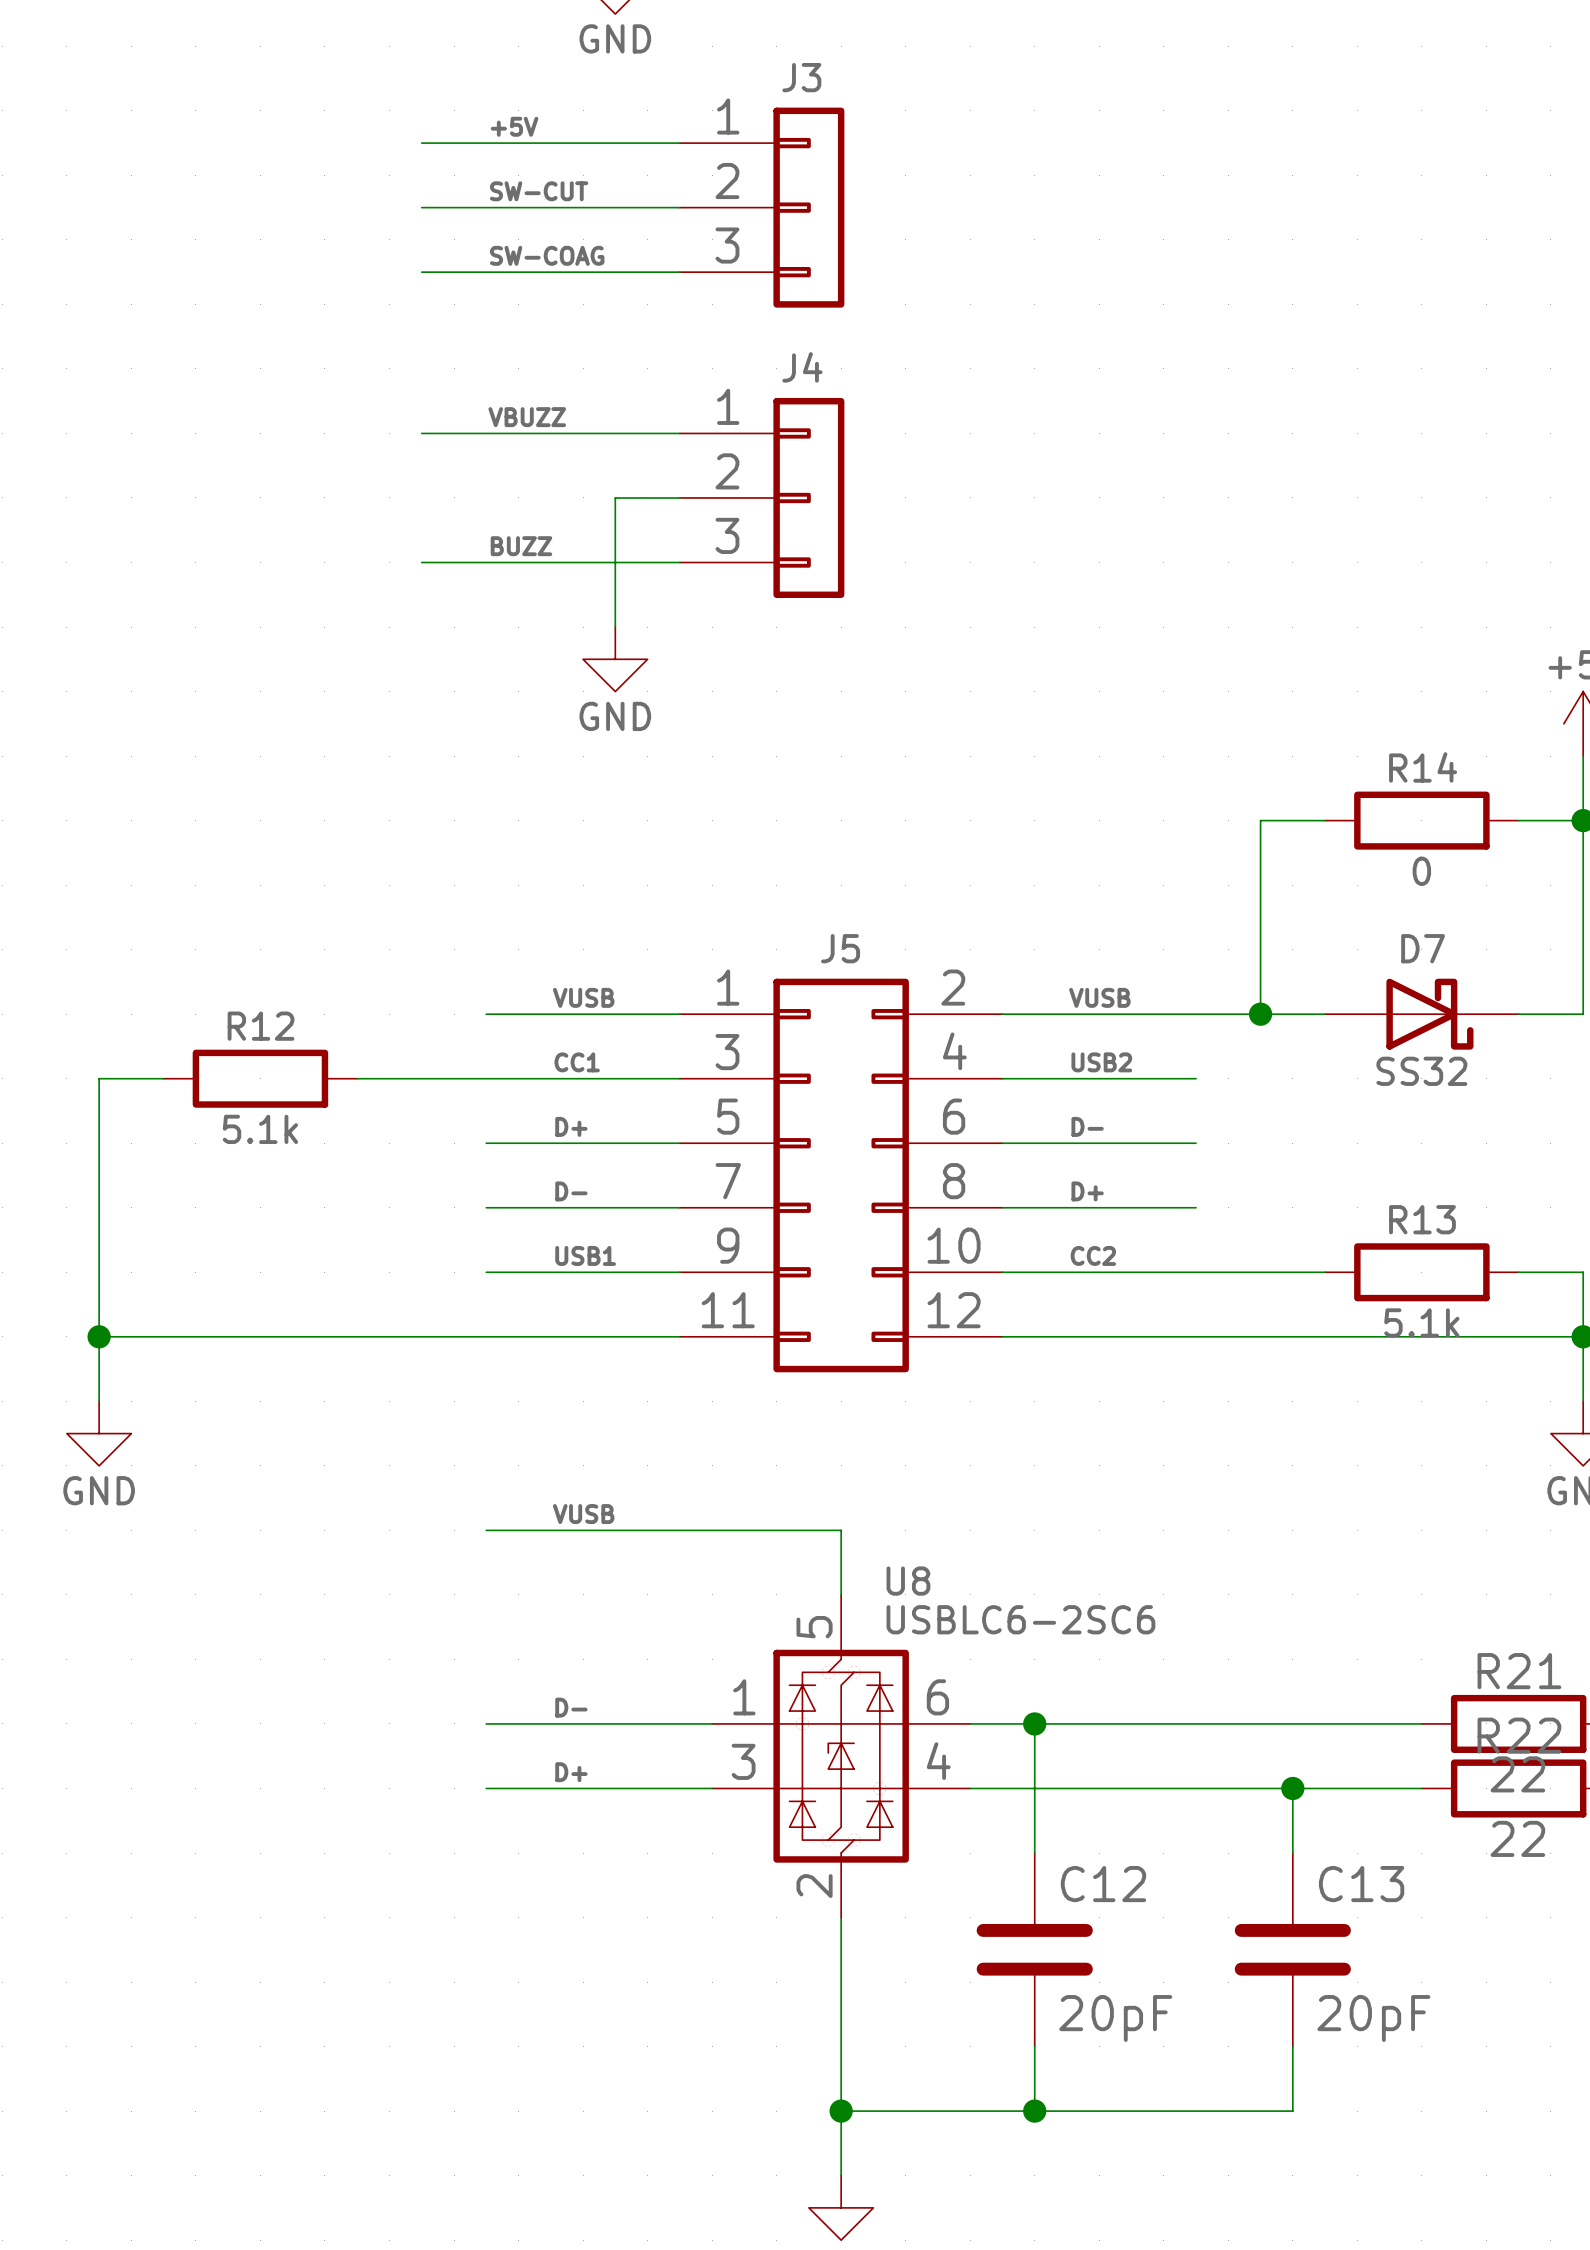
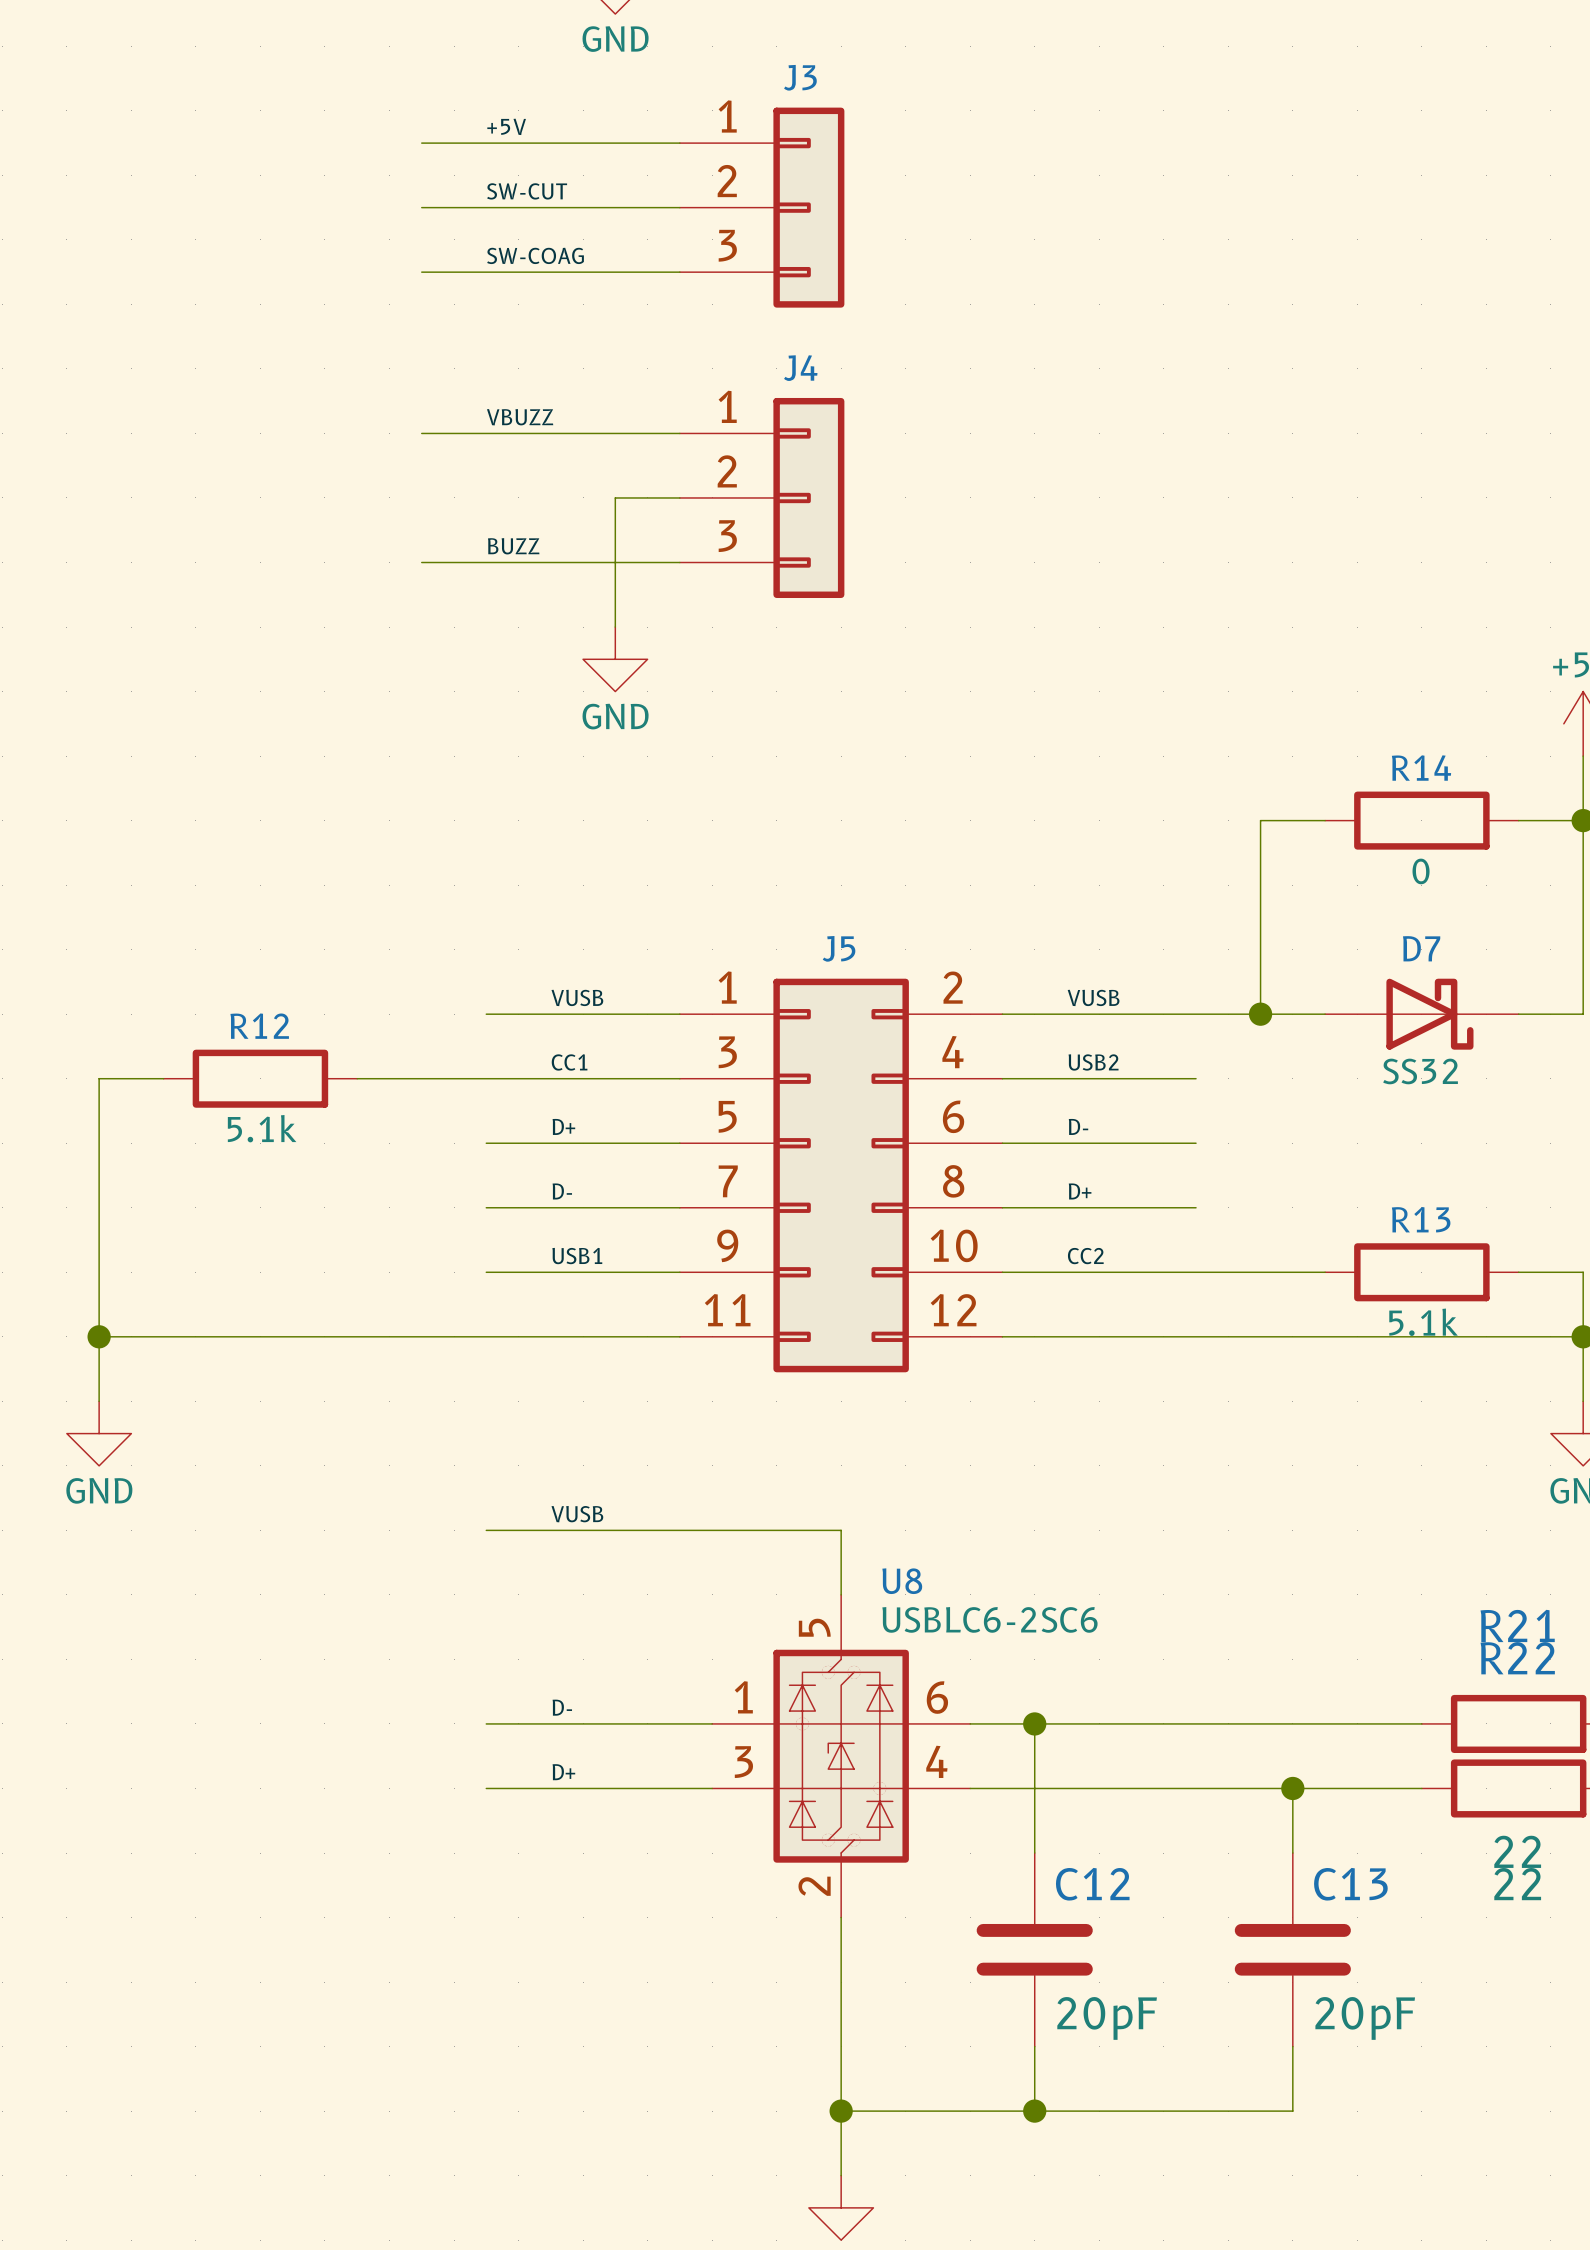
R21 name position: R21 (1519, 1671) -> R21 (1517, 1625)
R22 name position: R22 (1519, 1735) -> R22 (1517, 1658)
R21 value position: 22 (1517, 1774) -> 22 (1517, 1851)
R22 value position: 22 (1517, 1838) -> 22 (1517, 1884)

